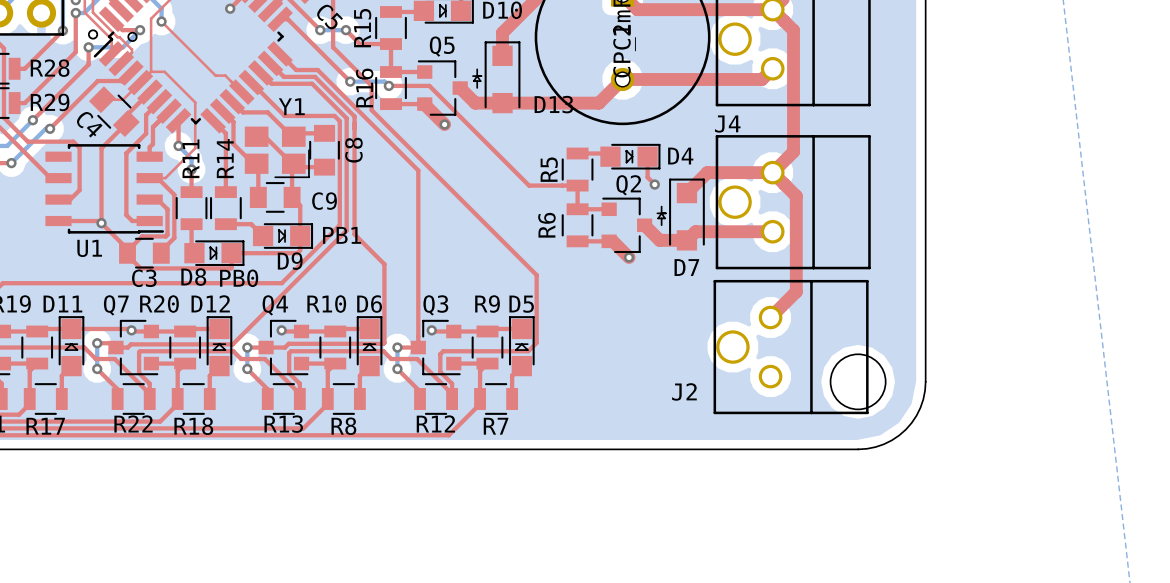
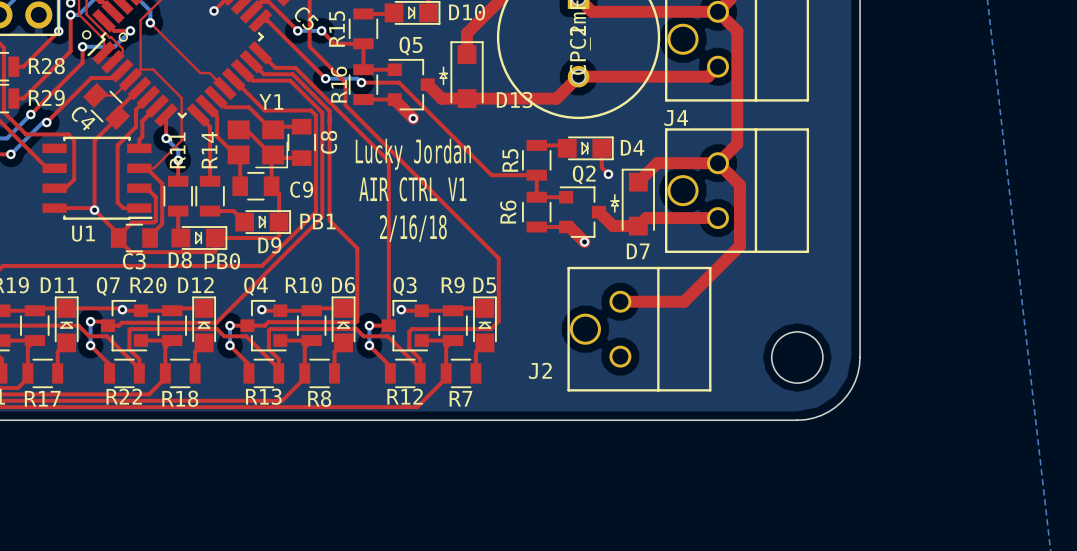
text: none -> Lucky Jordan (413, 154)
text: none -> AIR CTRL V1 (412, 189)
text: none -> 2/16/18 (413, 228)
top track: (796, 261) (796, 291) (770, 317) -> (739, 245) (684, 301) (620, 301)
J2 position: (791, 347) -> (639, 329)

